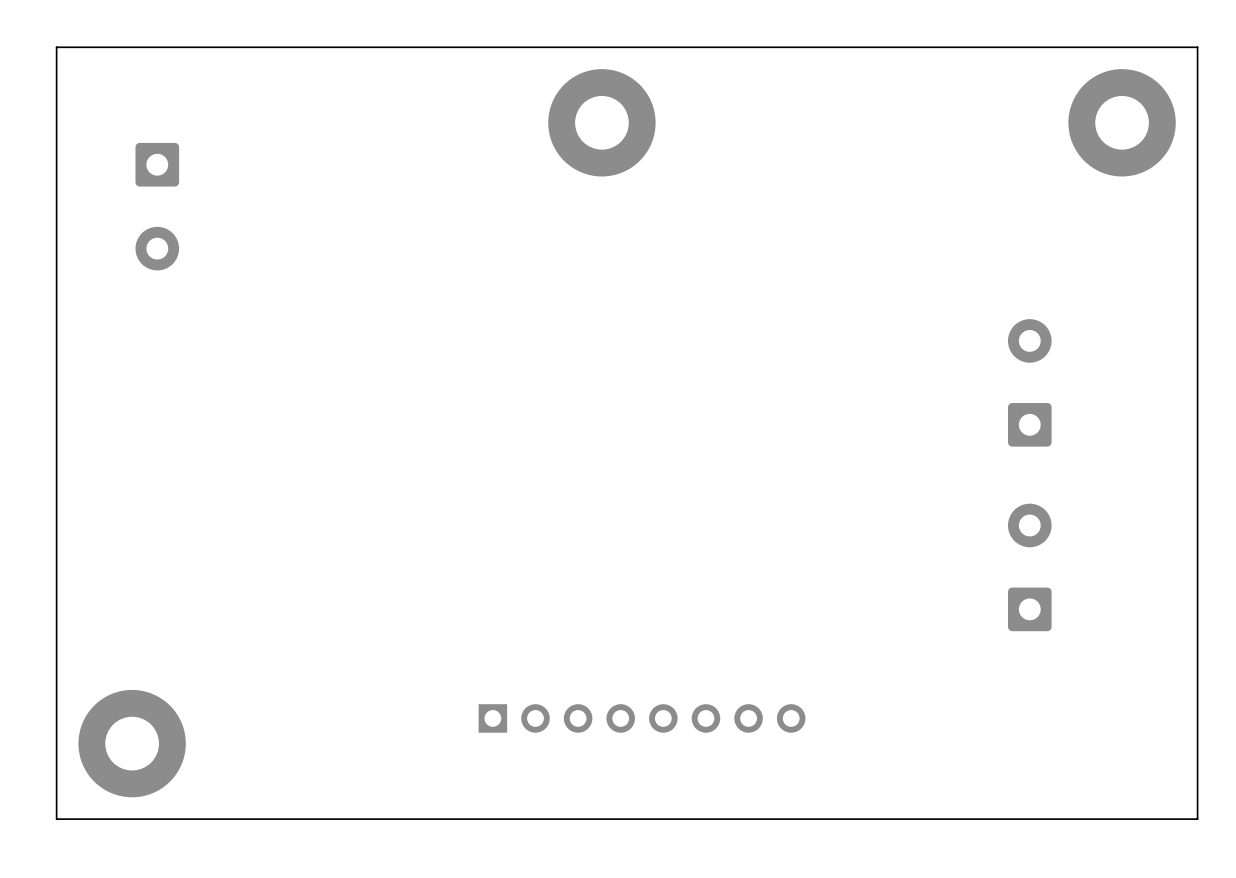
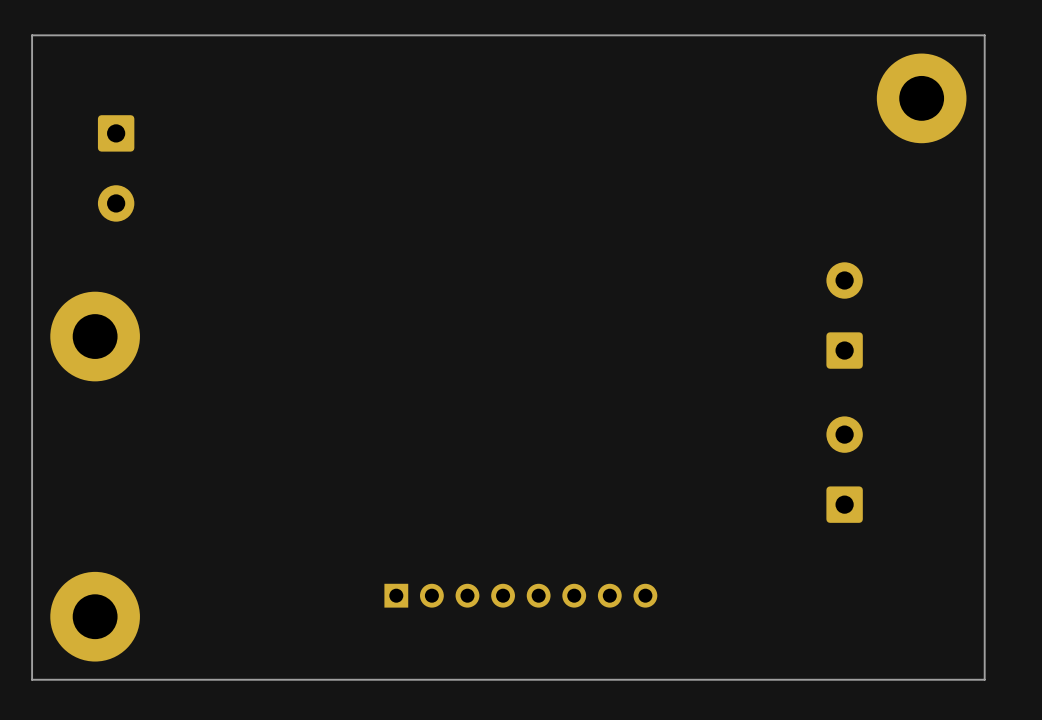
part: (601, 122) -> none
part: none -> (95, 336)

